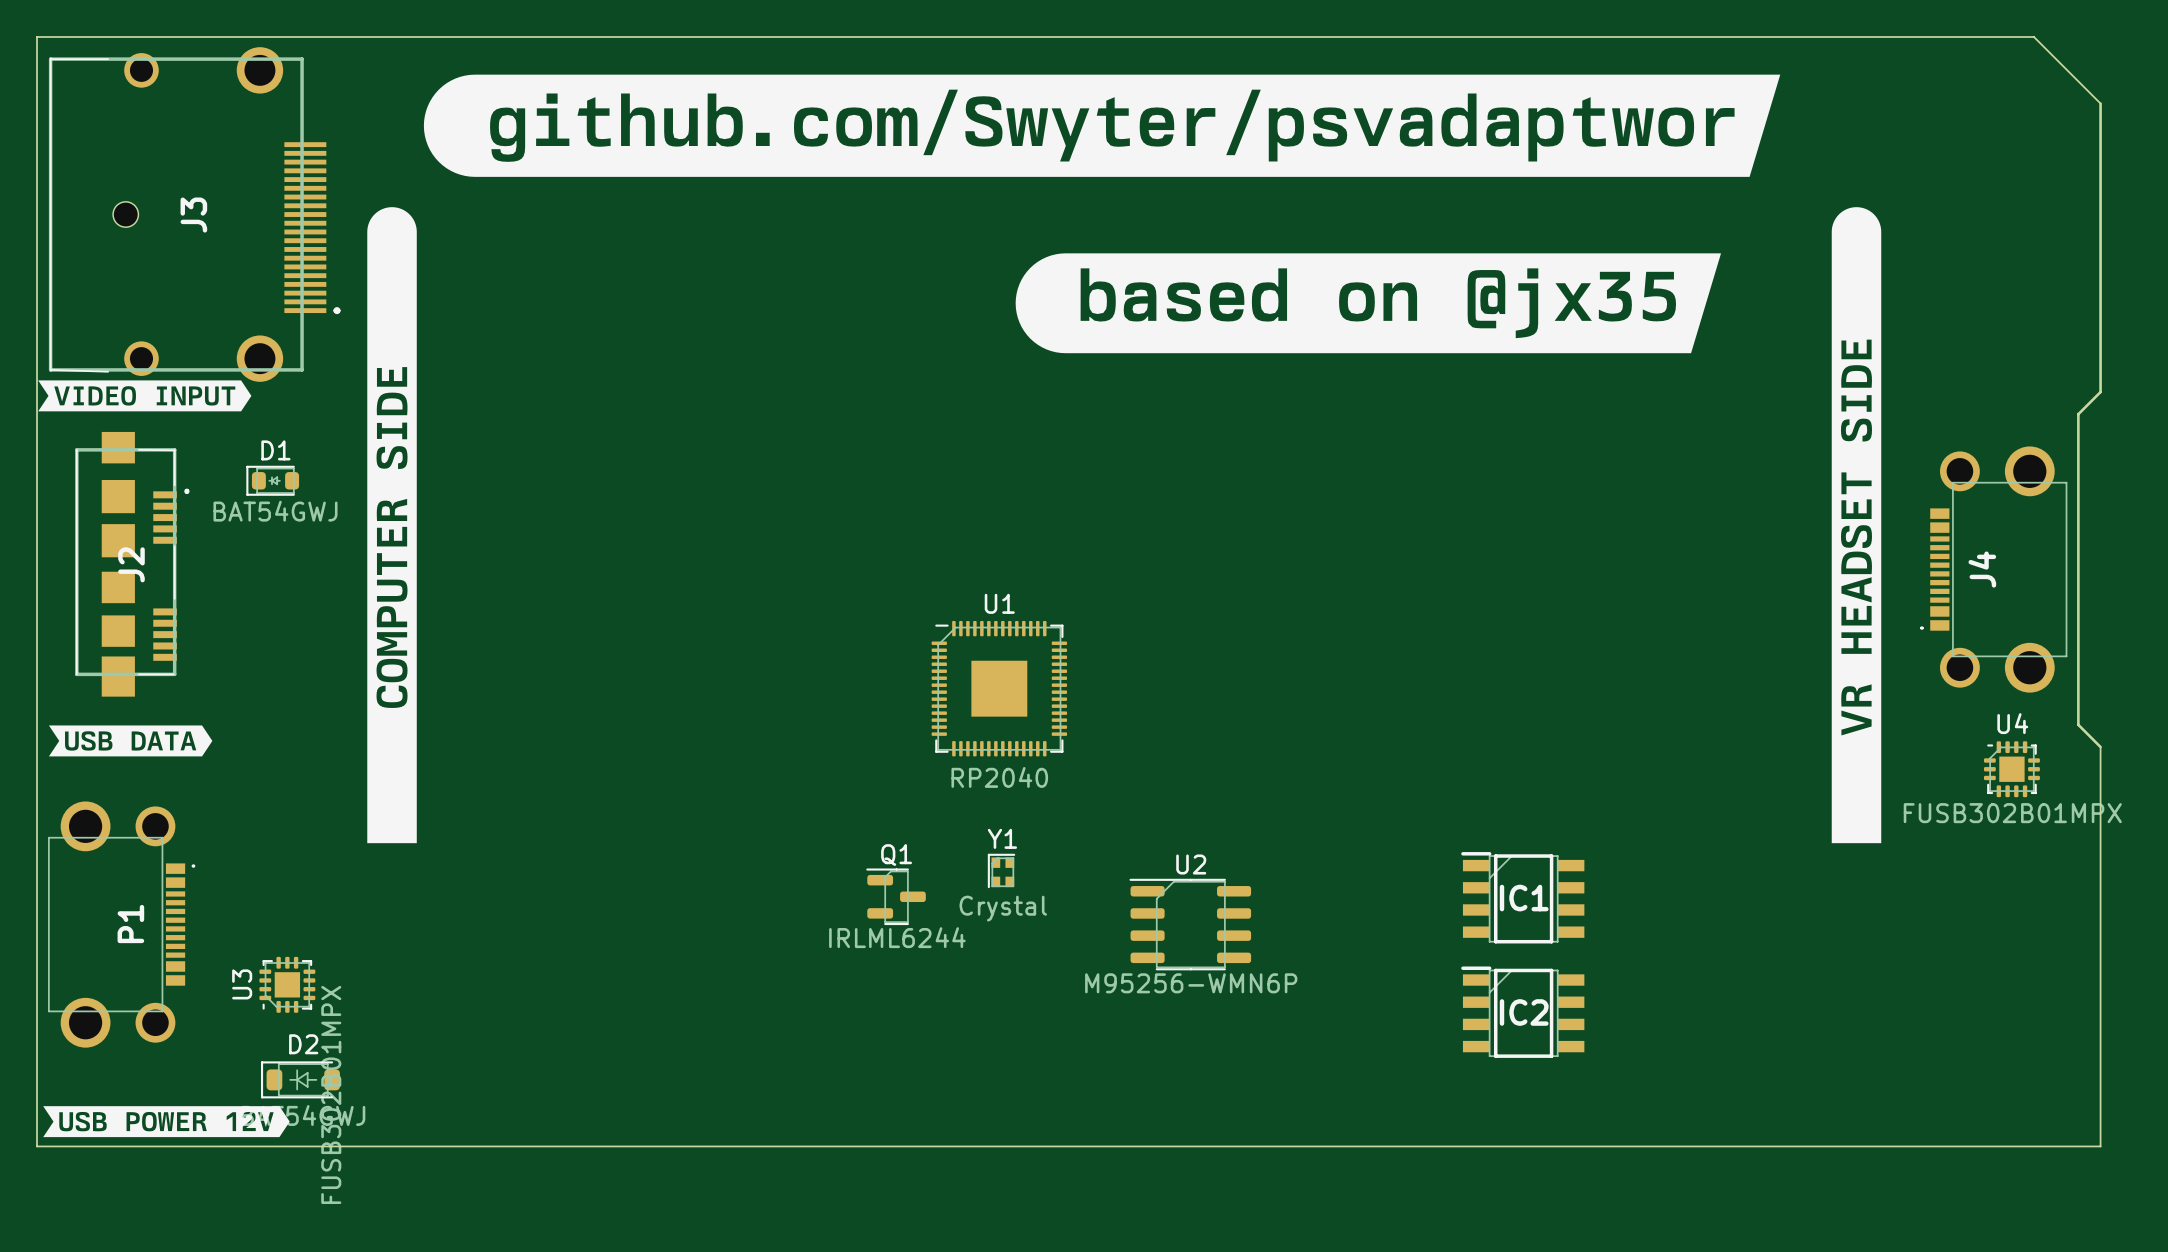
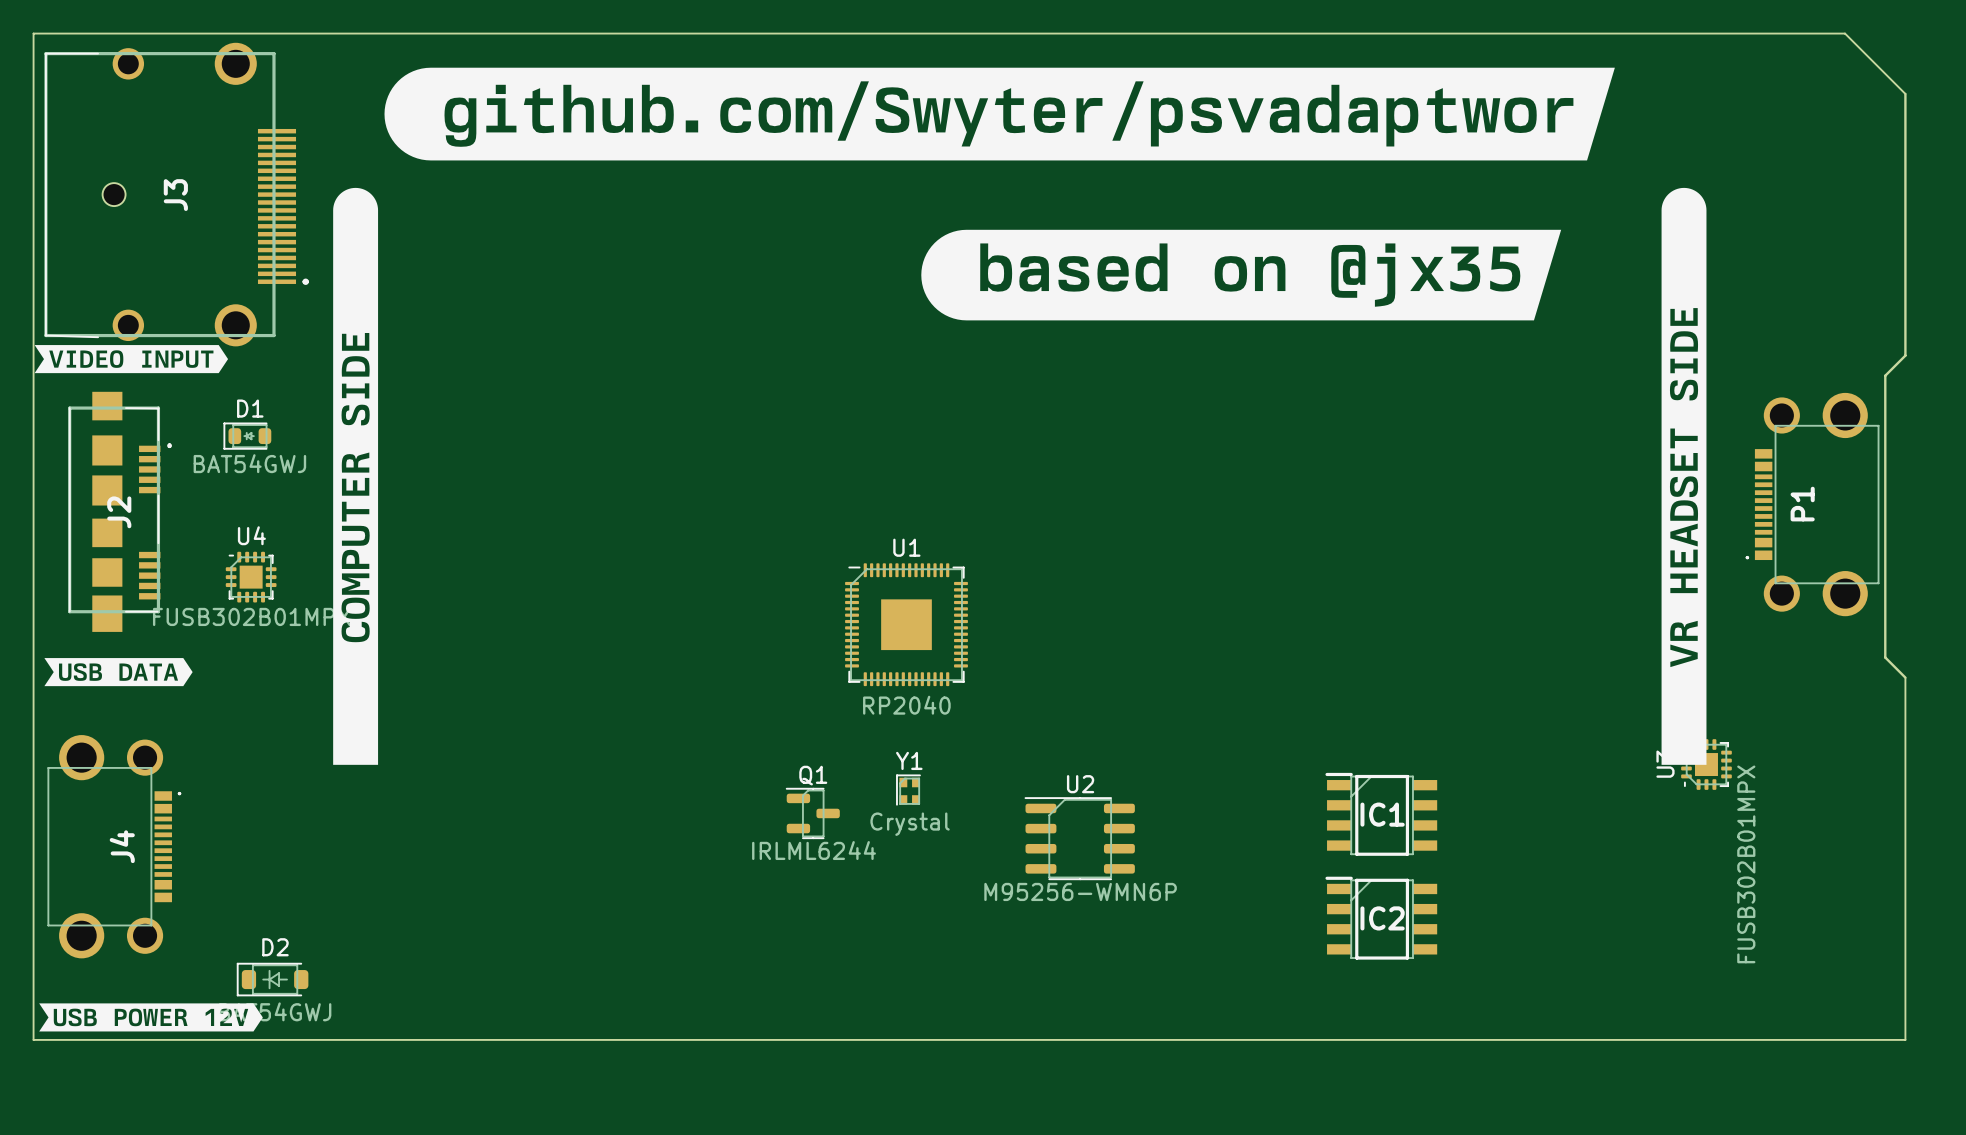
J4 rotation: 0° (1993, 569) -> 180° (114, 846)
J4 position: (1993, 569) -> (114, 846)
U4 position: (2011, 769) -> (251, 577)
P1 rotation: 0° (121, 924) -> 180° (1812, 504)
P1 position: (121, 924) -> (1812, 504)
U3 position: (287, 984) -> (1706, 764)

